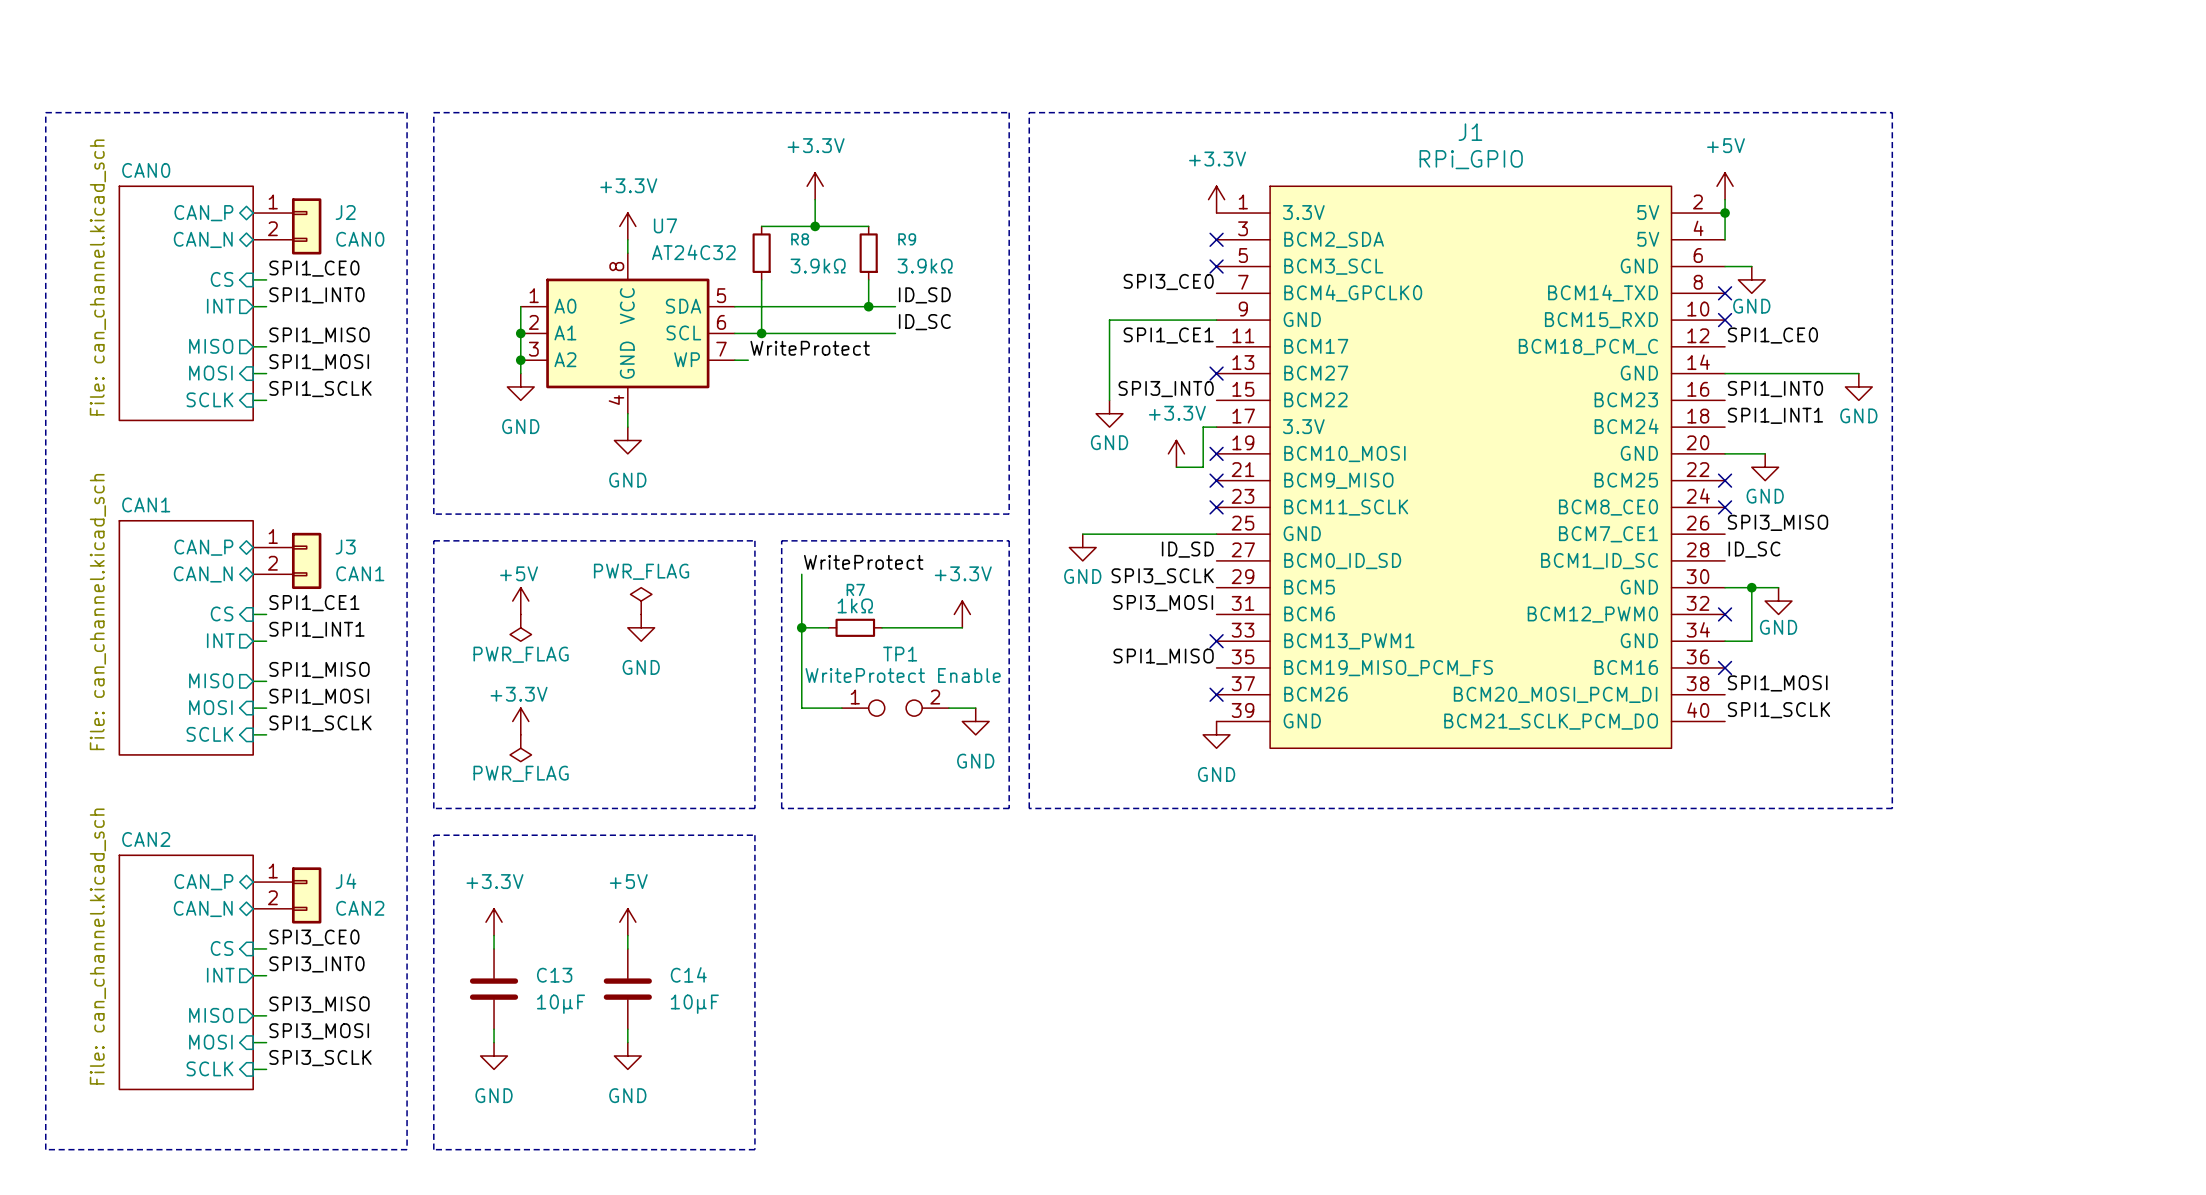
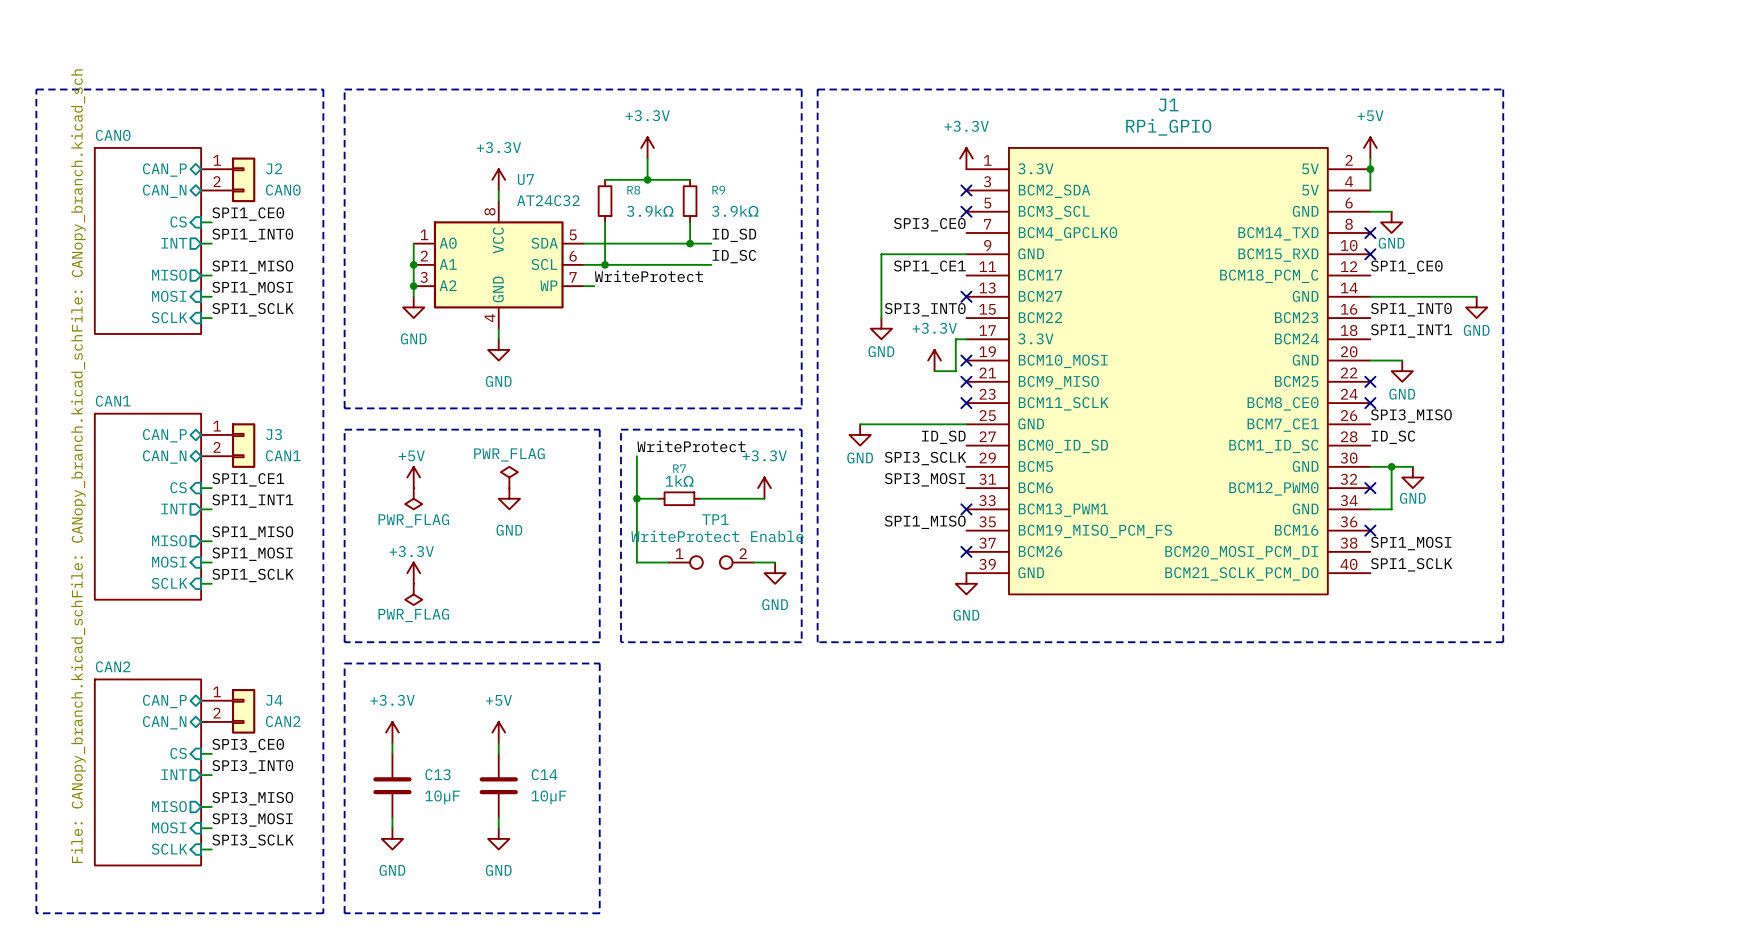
sheet CAN0 value: File: can_channel.kicad_sch (97, 277) -> File: CANopy_branch.kicad_sch (78, 200)
sheet CAN1 value: File: can_channel.kicad_sch (97, 612) -> File: CANopy_branch.kicad_sch (78, 466)
sheet CAN2 value: File: can_channel.kicad_sch (97, 946) -> File: CANopy_branch.kicad_sch (78, 731)

